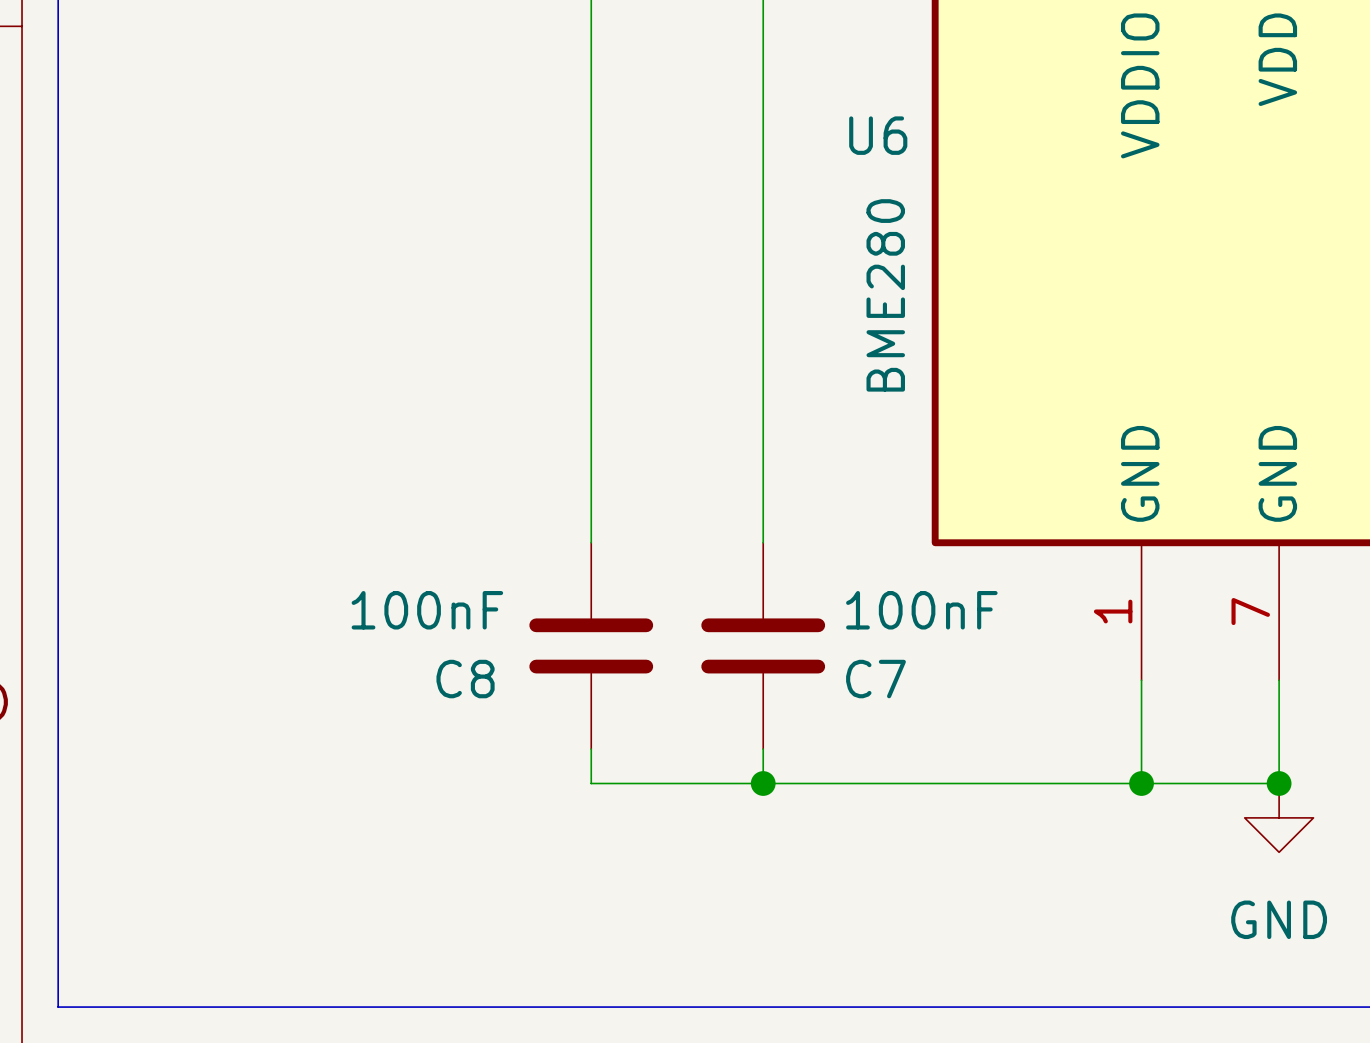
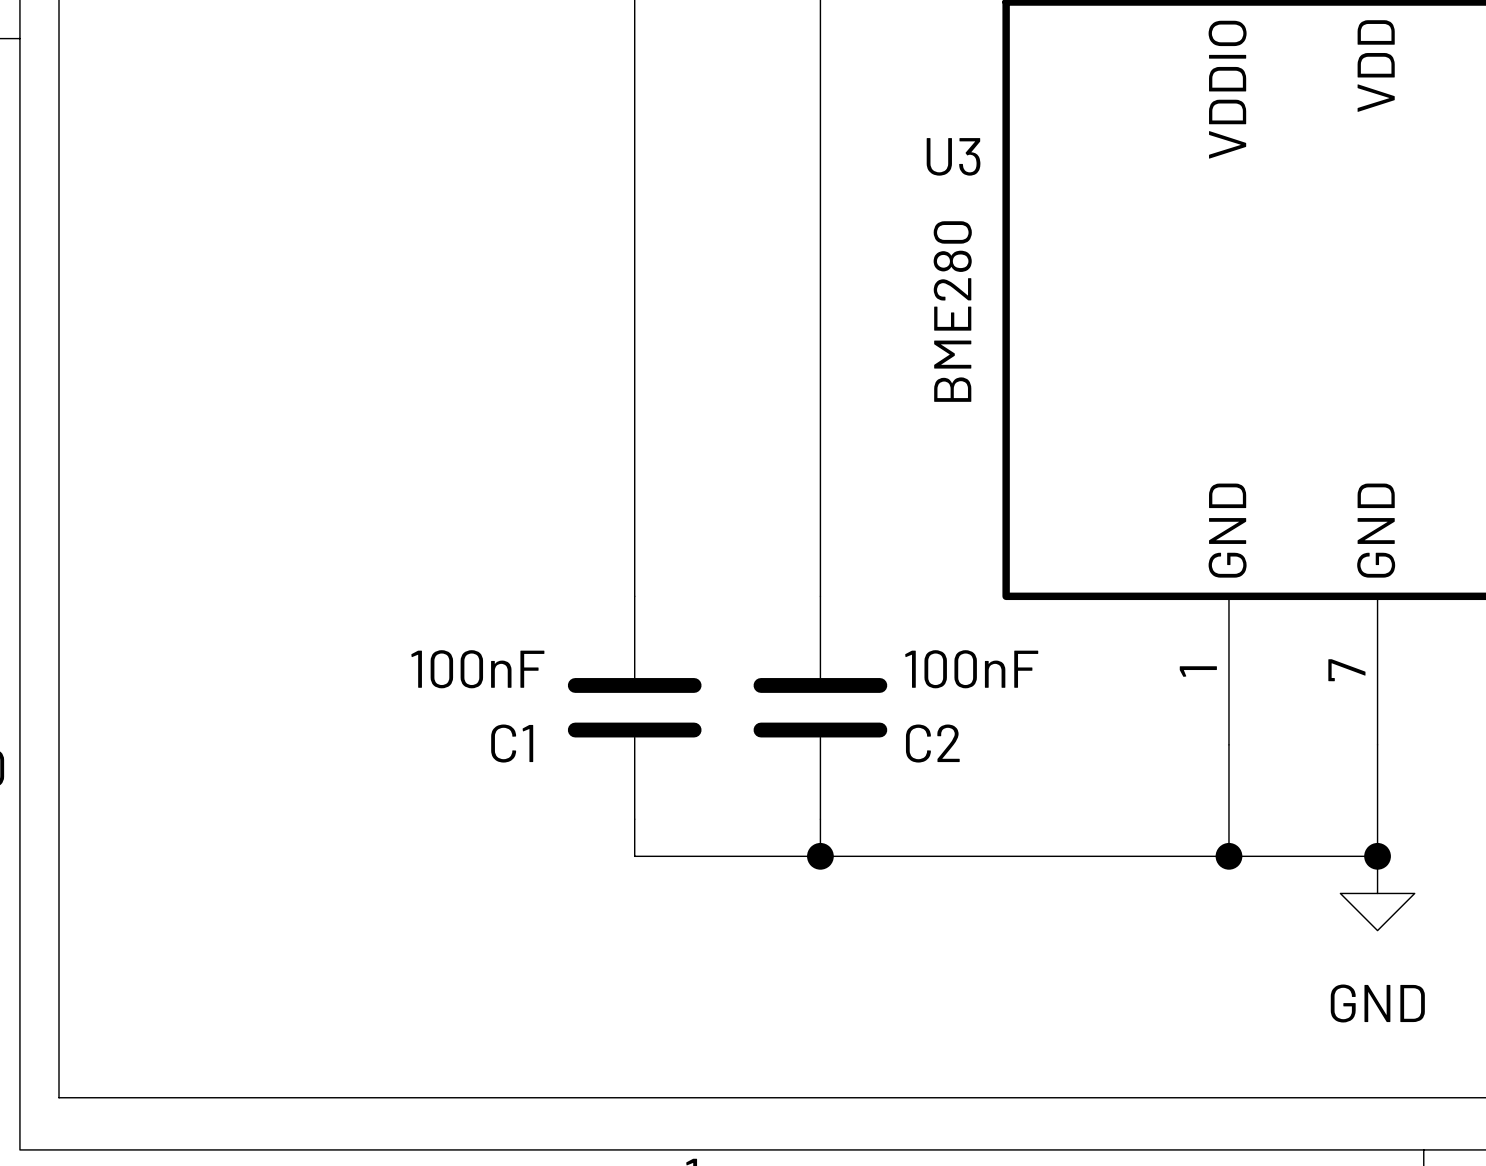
U6 name: U6 (878, 135) -> U3 (953, 156)
C8 name: C8 (465, 679) -> C1 (512, 743)
C7 name: C7 (875, 679) -> C2 (932, 743)

